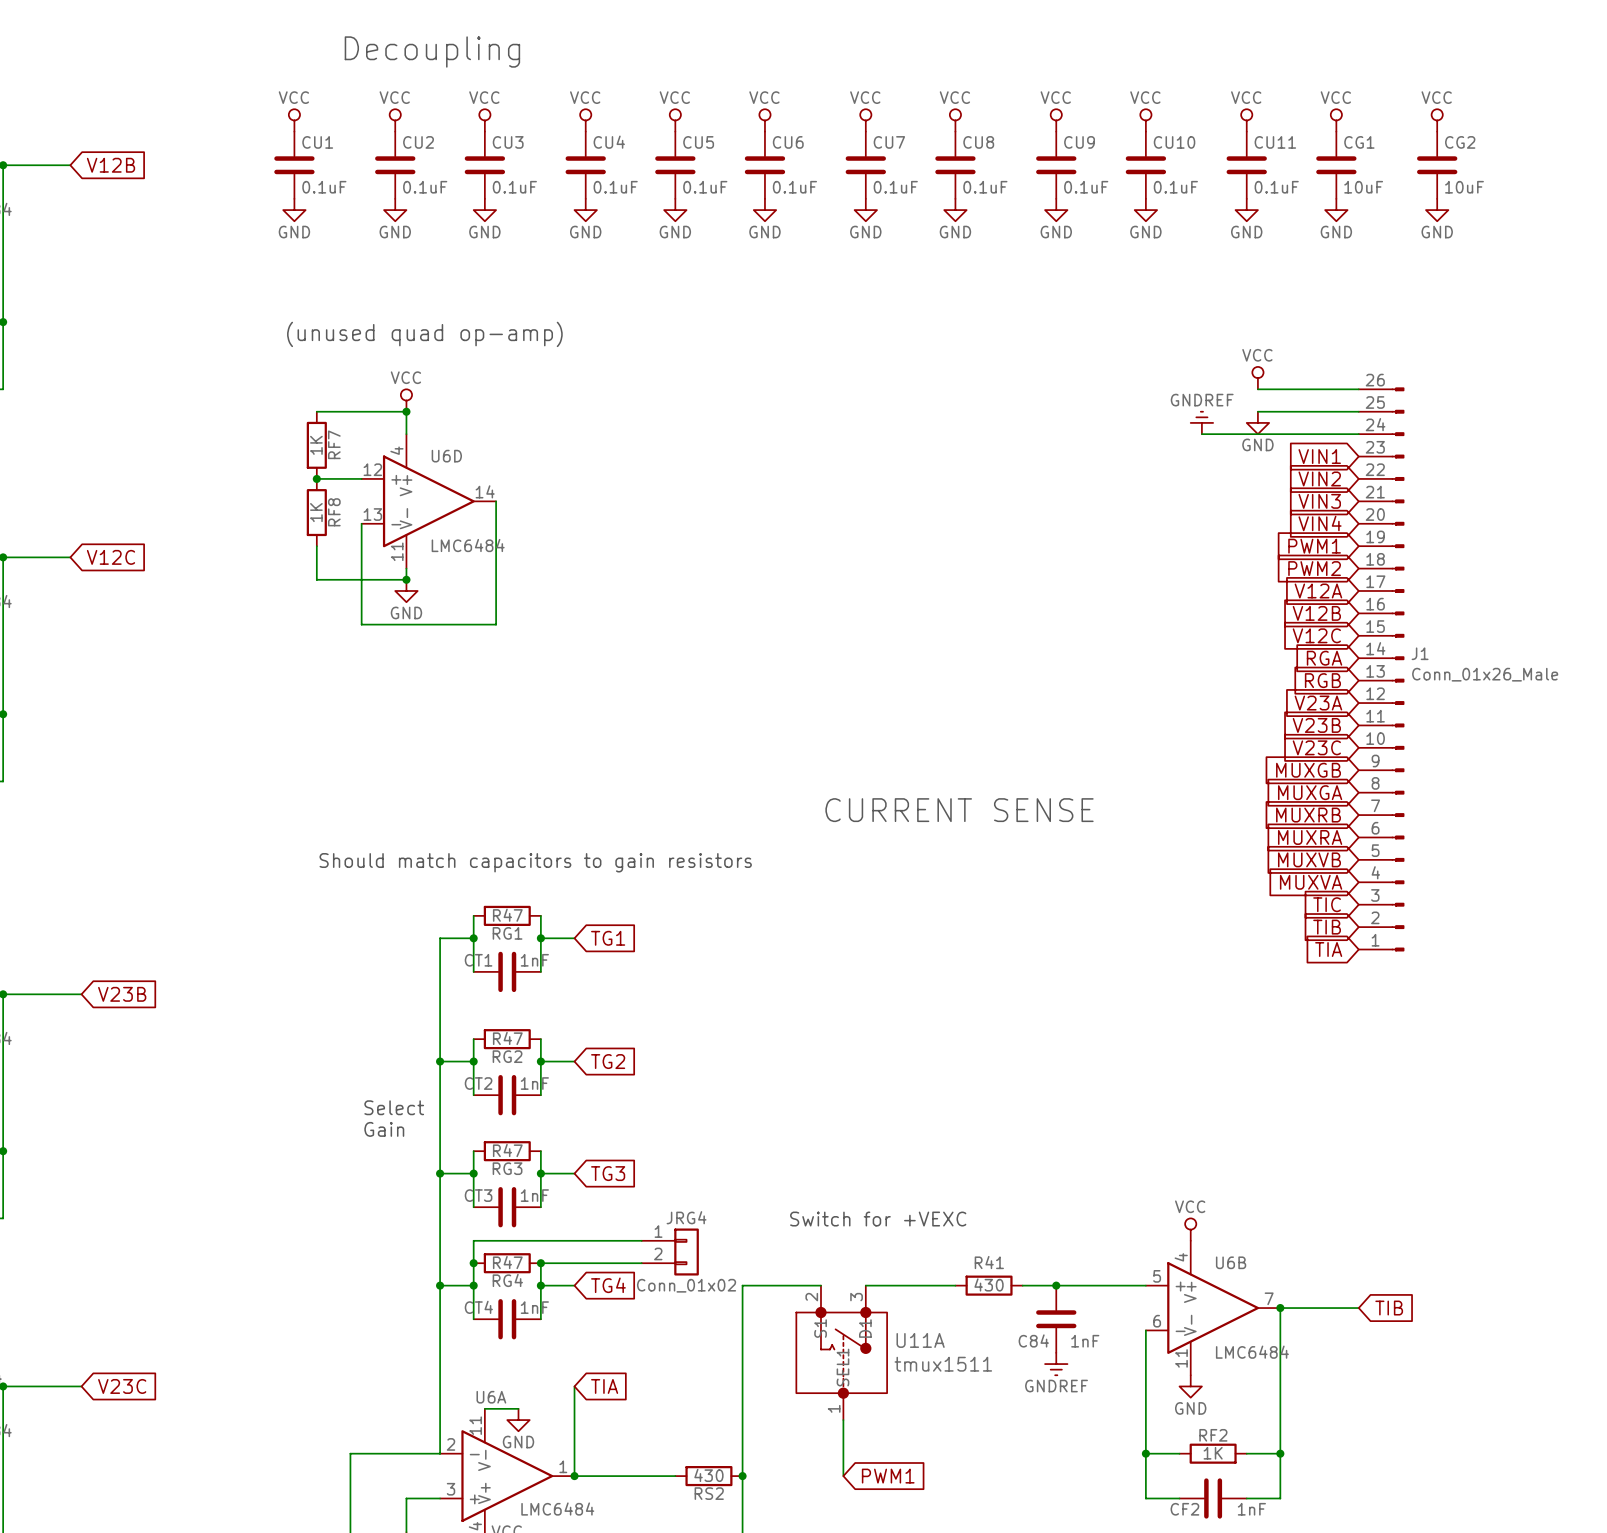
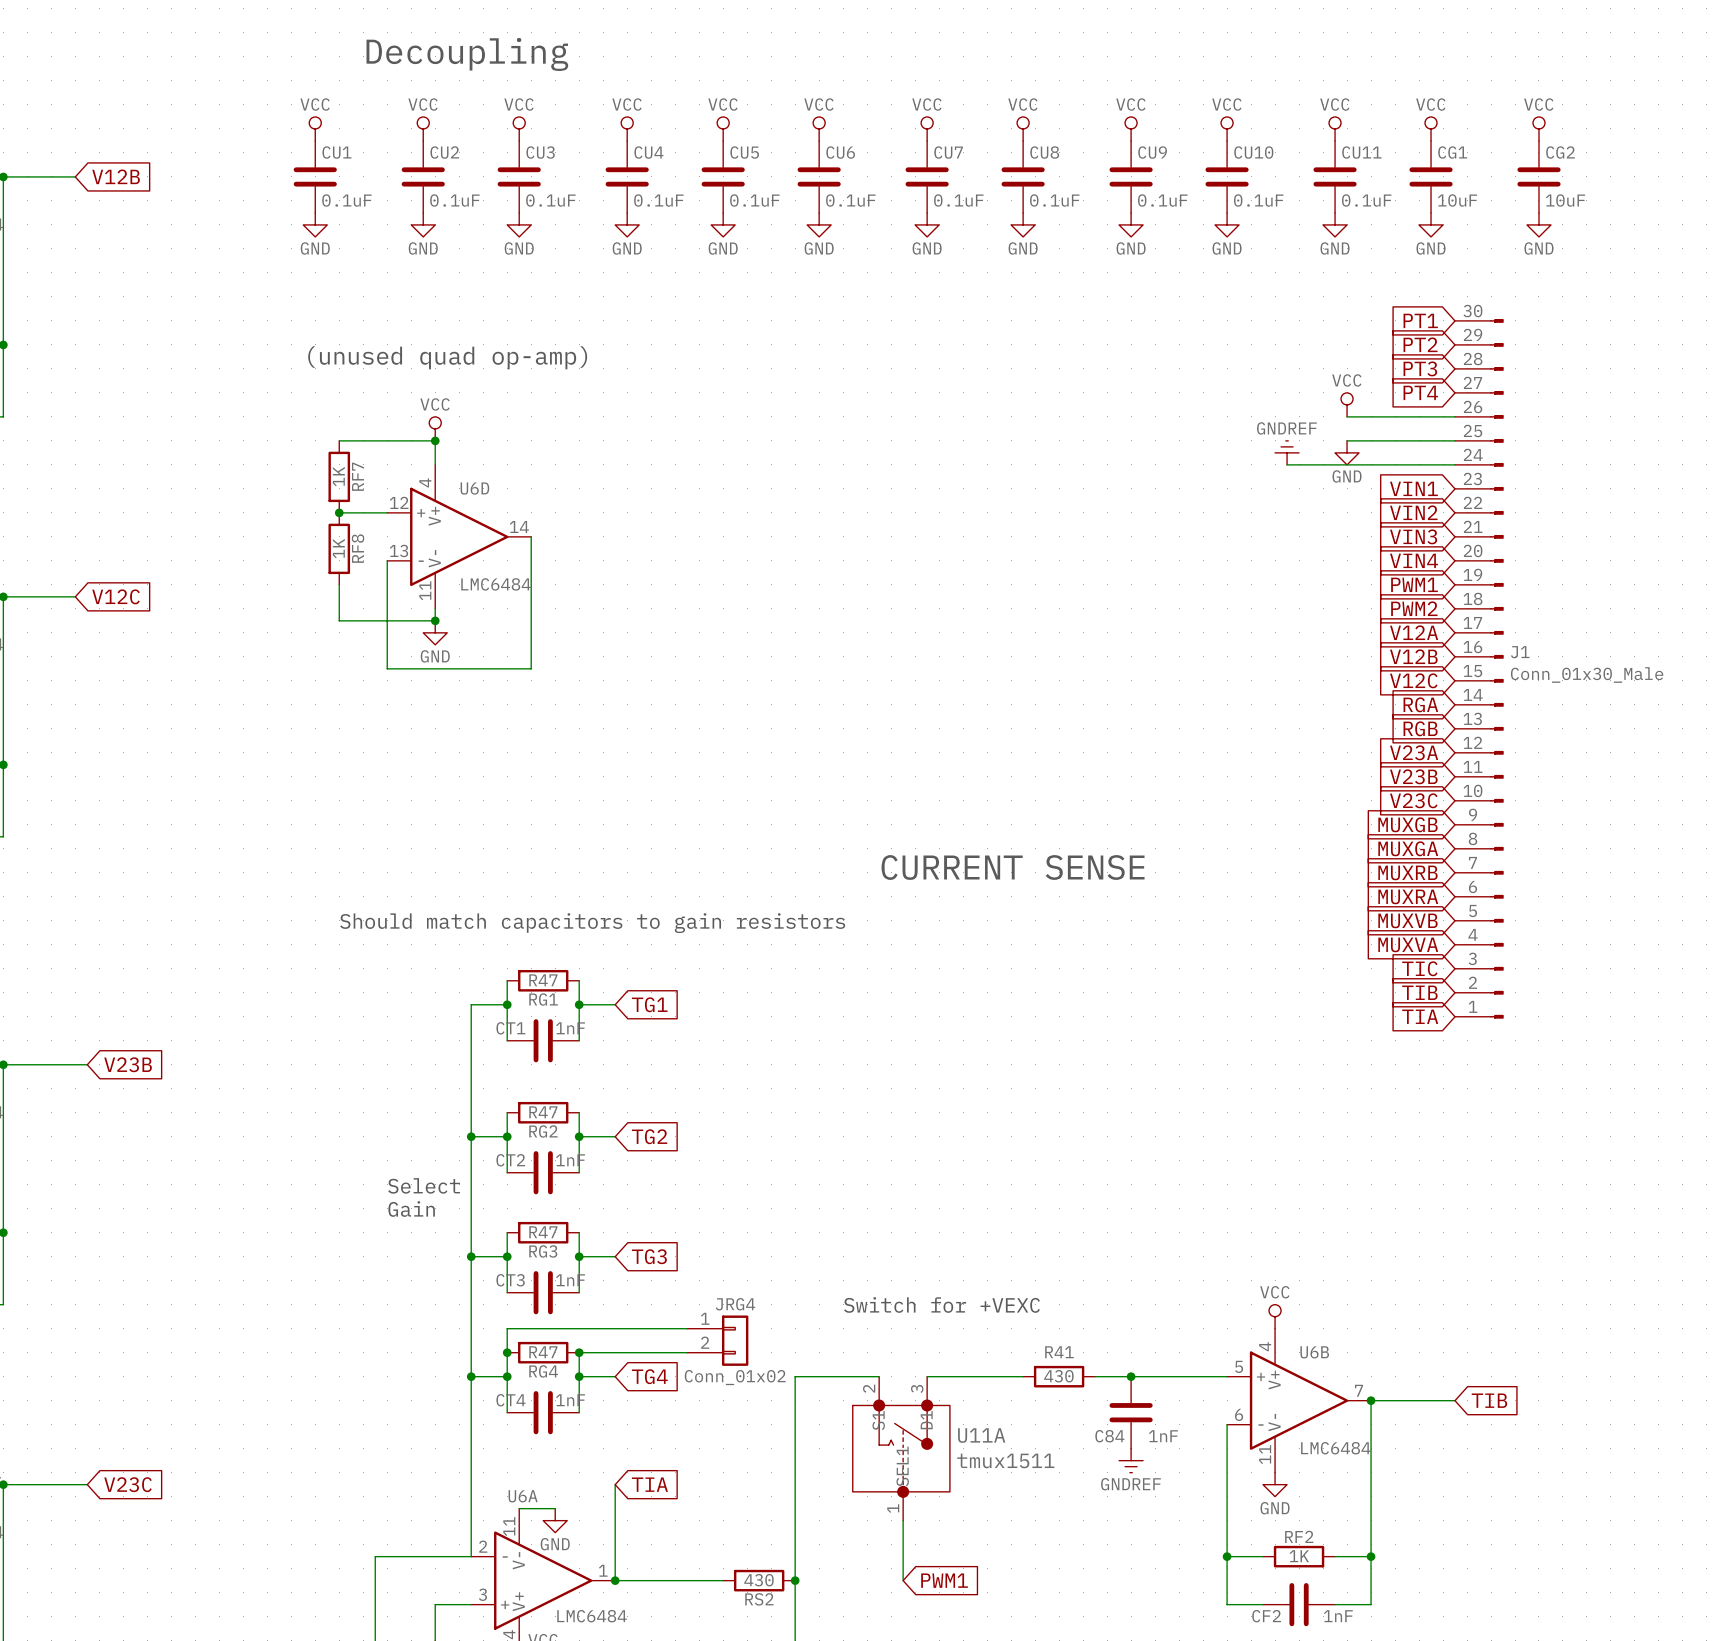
global label: none -> PT1 (1420, 320)
global label: none -> PT2 (1420, 344)
global label: none -> PT3 (1420, 368)
global label: none -> PT4 (1420, 392)
J1 symbol: [1358, 387, 1405, 952] -> [1455, 319, 1504, 1019]
J1 value: Conn_01x26_Male (1485, 674) -> Conn_01x30_Male (1587, 675)

